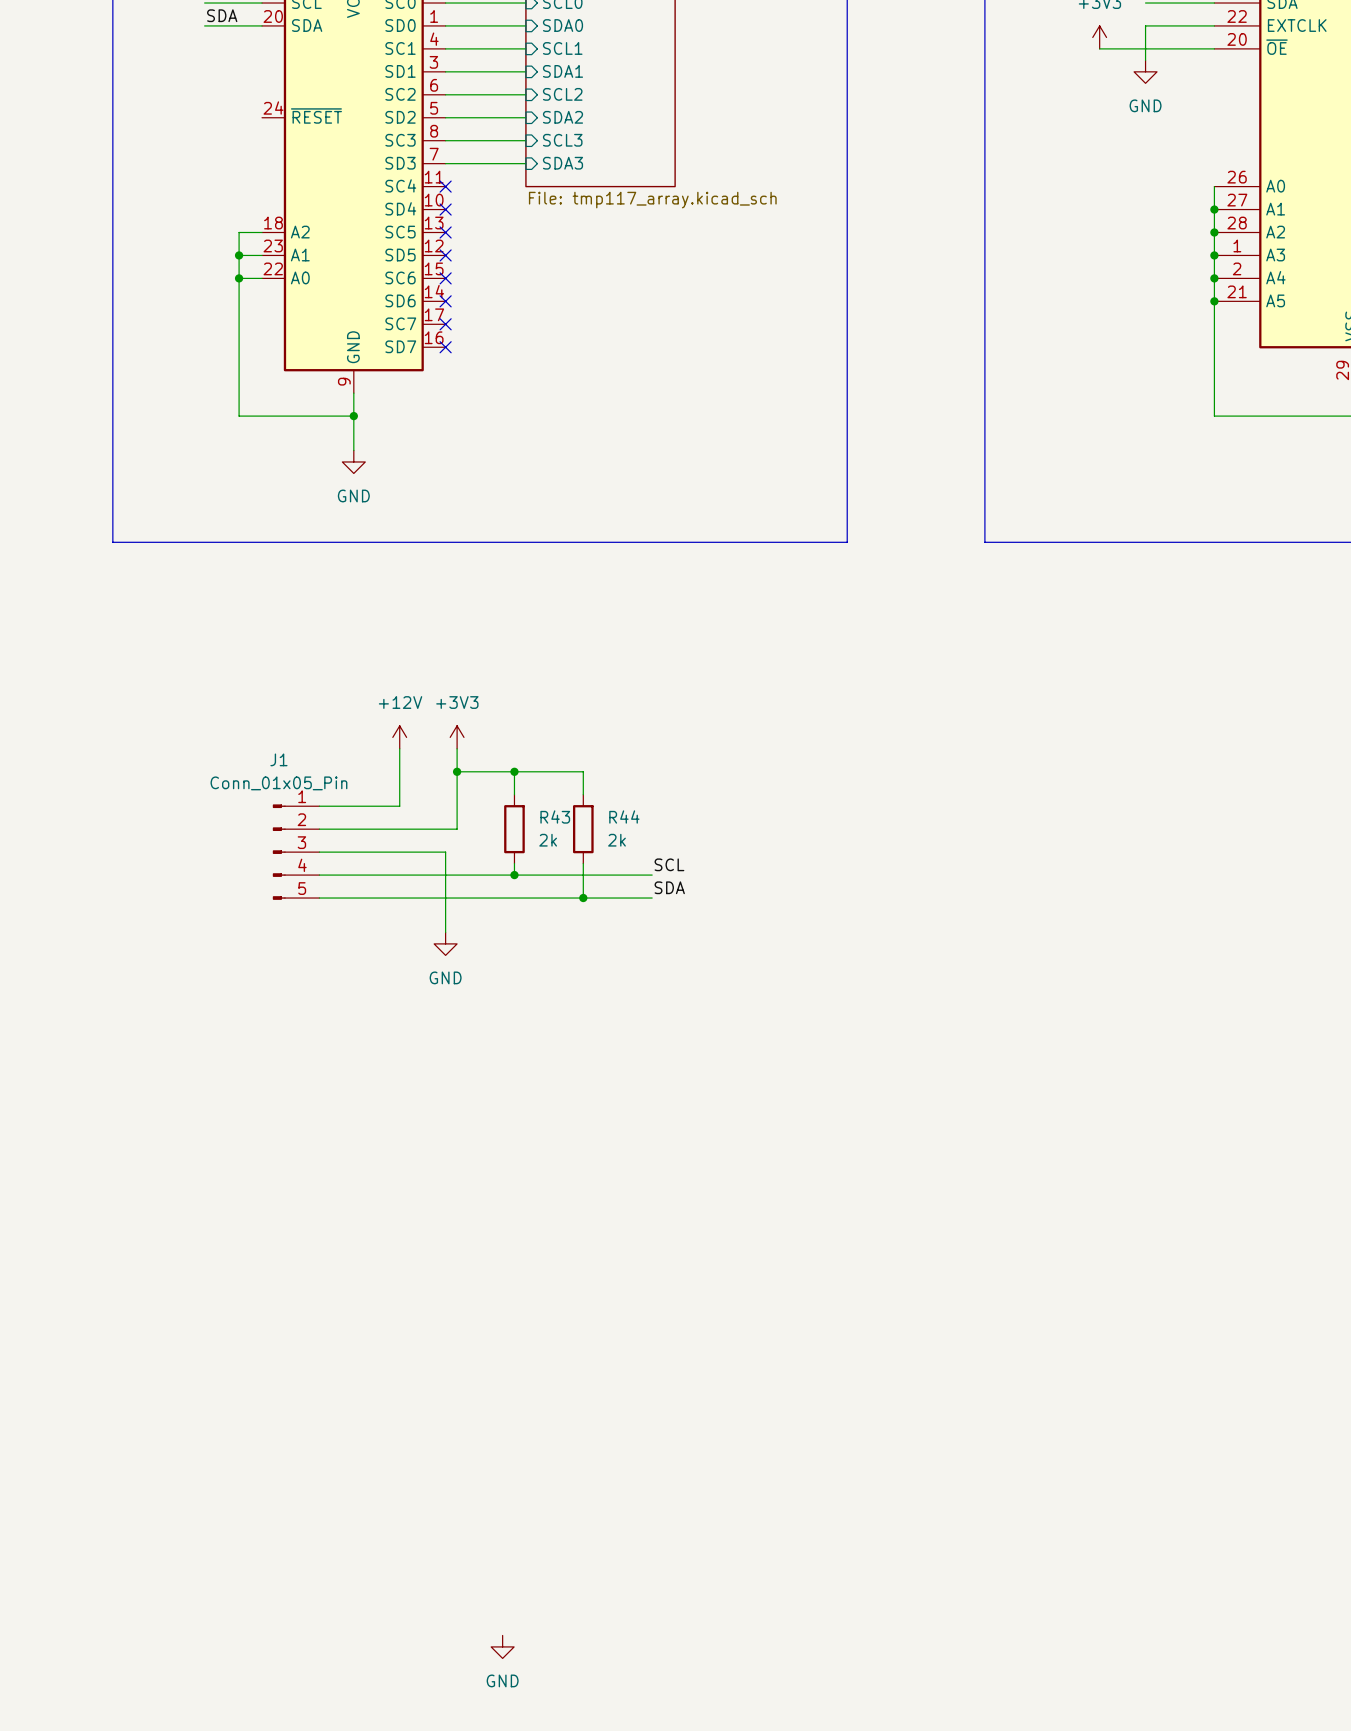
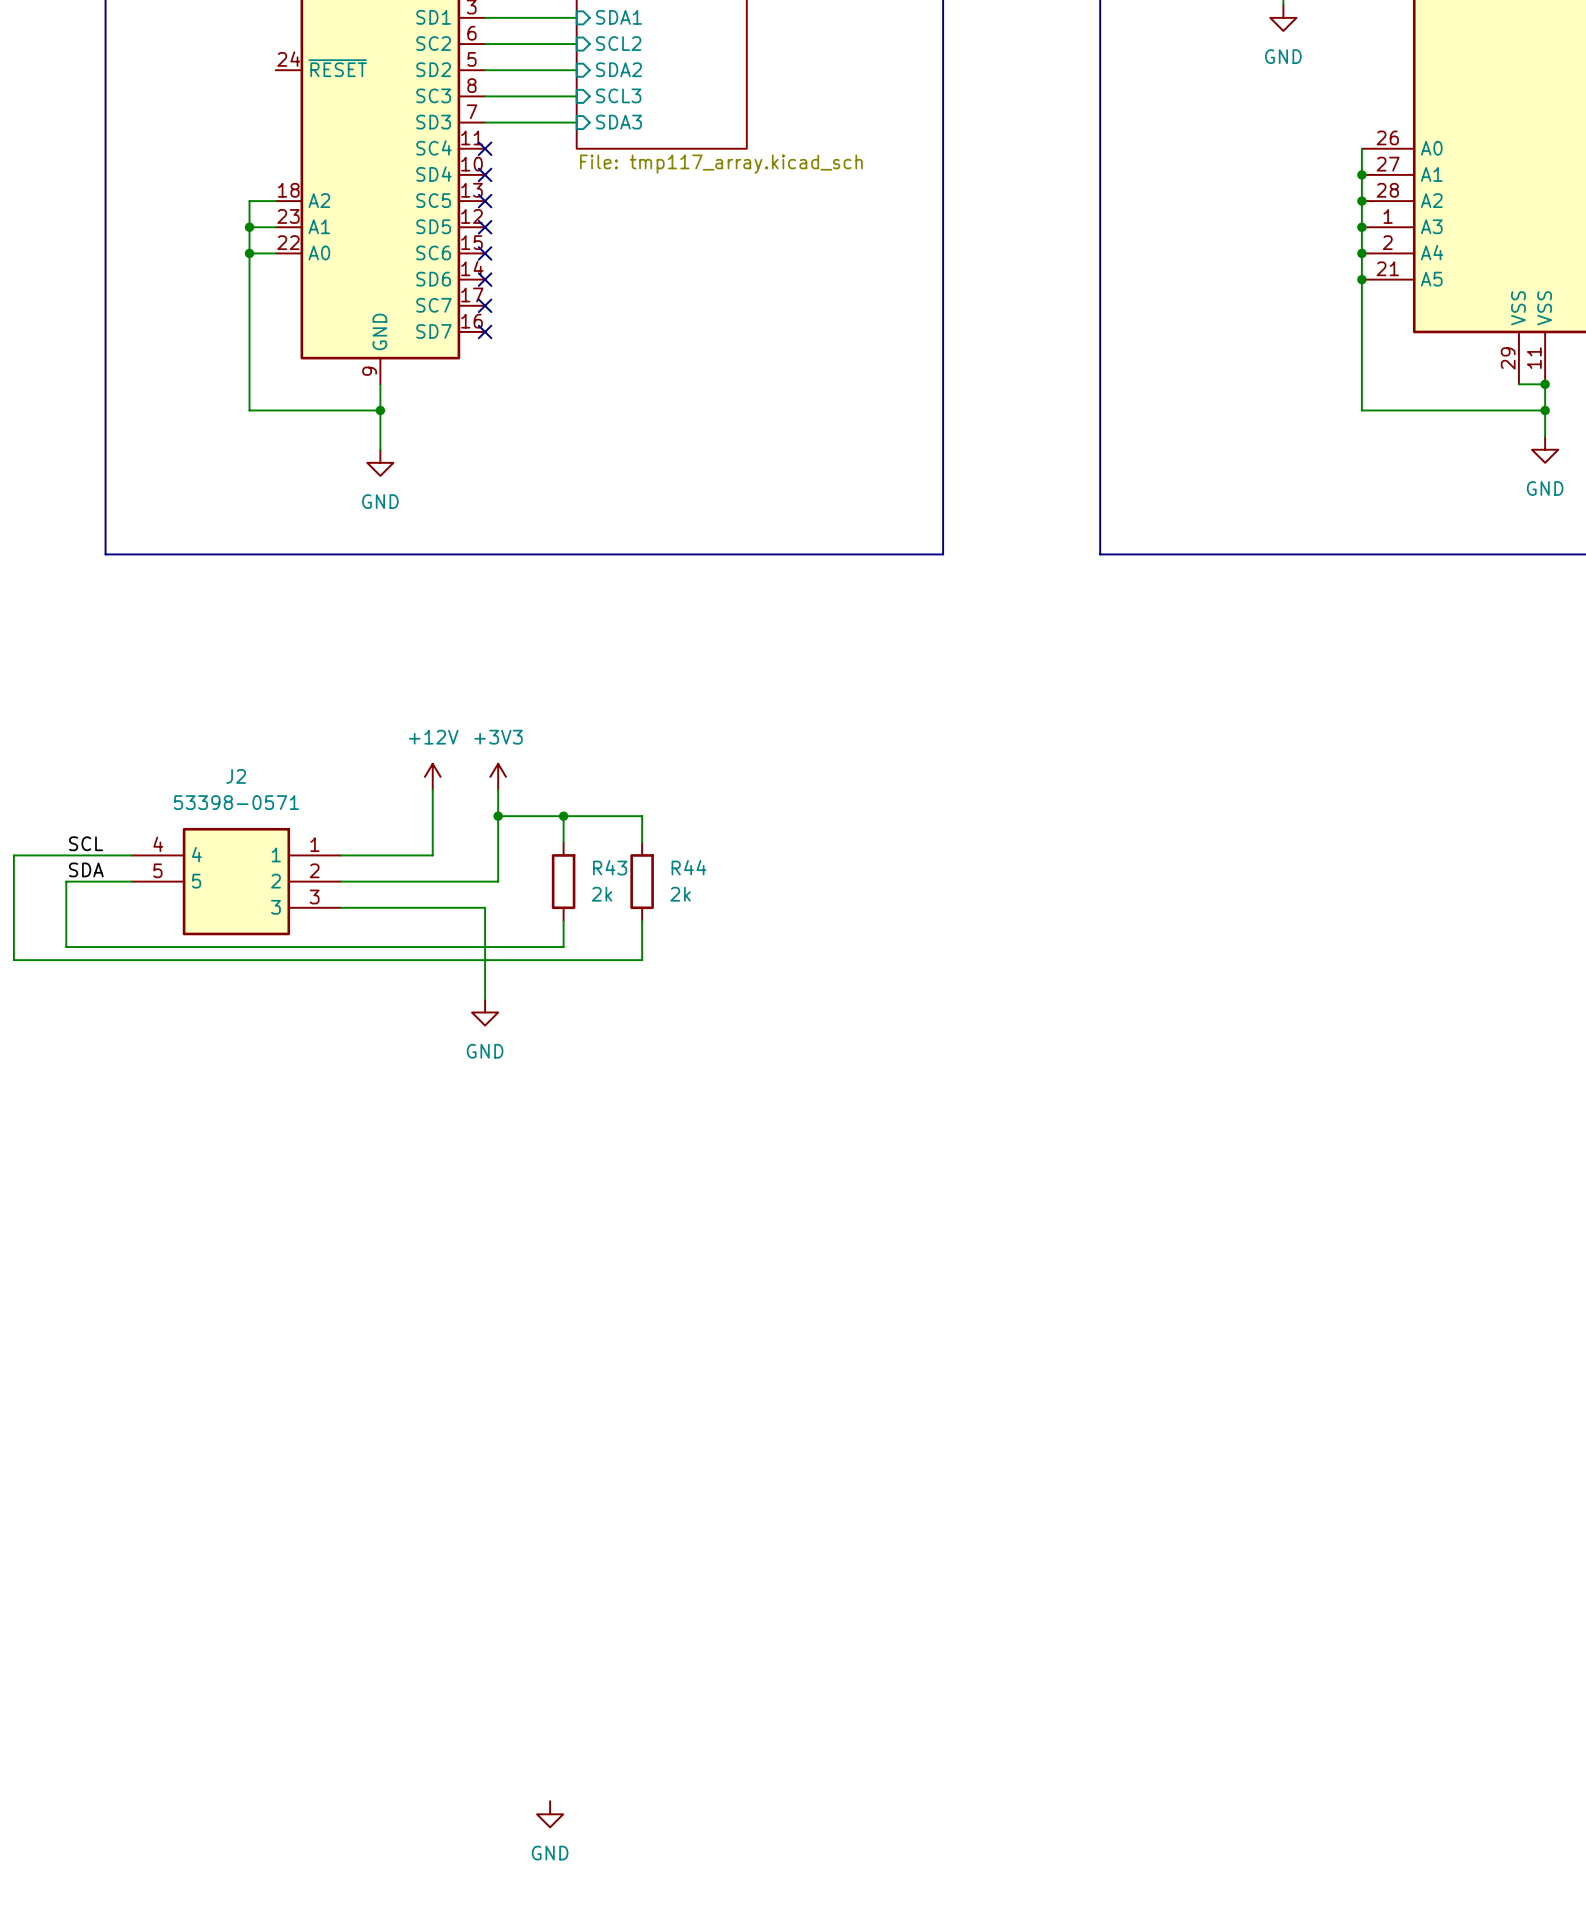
label: none -> SCL (86, 843)
wire: none -> (131, 855) (13, 855) (13, 960) (341, 960)
label: none -> SDA (86, 869)
wire: none -> (131, 881) (66, 881) (66, 947) (563, 947) (563, 933)
J2: none -> 53398-0571 (236, 881)
J1: Conn_01x05_Pin (296, 852) -> none
label: SCL (669, 864) -> none
wire: (319, 875) (652, 875) -> none
junction: (514, 875) -> none
label: SDA (669, 887) -> none
wire: (583, 898) (652, 898) -> none
junction: (583, 898) -> none

